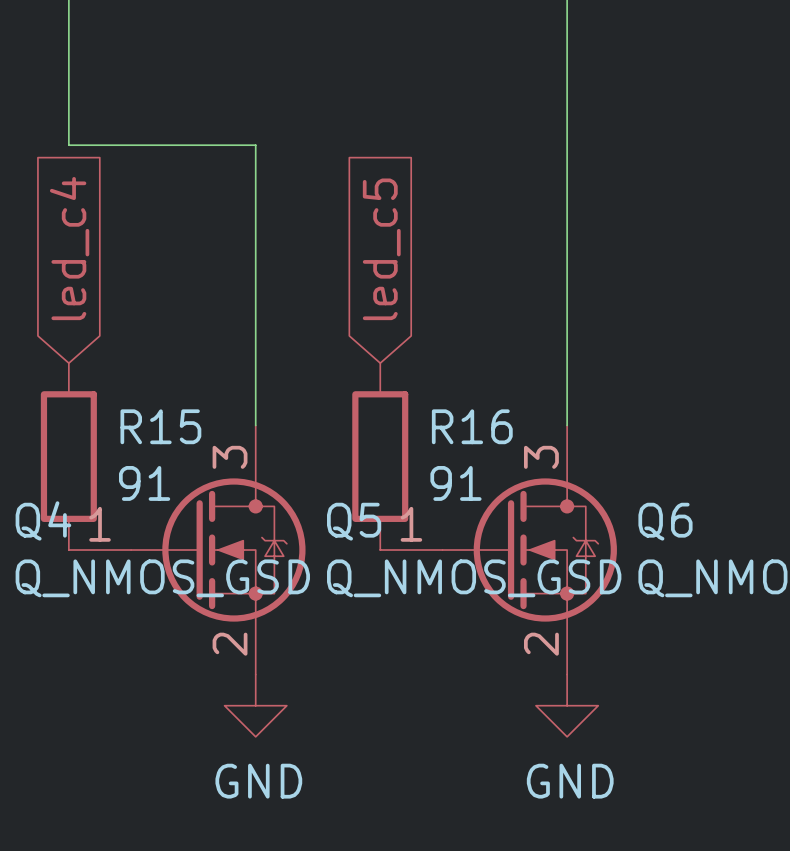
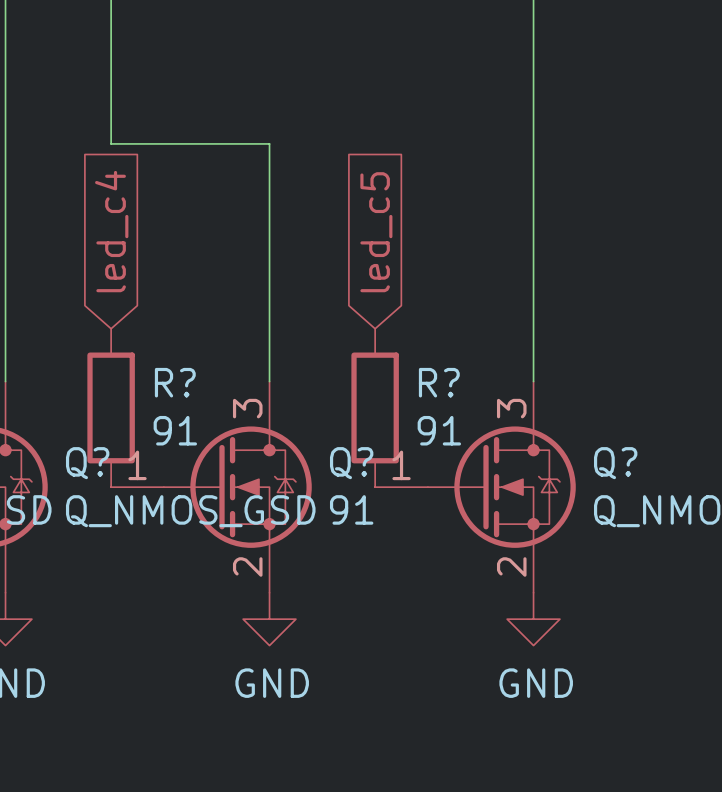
R15 name: R15 (160, 426) -> R? (175, 382)
R16 name: R16 (472, 426) -> R? (439, 382)
Q4 name: Q4 (43, 520) -> Q? (87, 463)
Q5 name: Q5 (354, 521) -> Q? (351, 463)
Q6 name: Q6 (665, 521) -> Q? (615, 463)
Q5 value: Q_NMOS_GSD (474, 578) -> 91 (351, 509)

